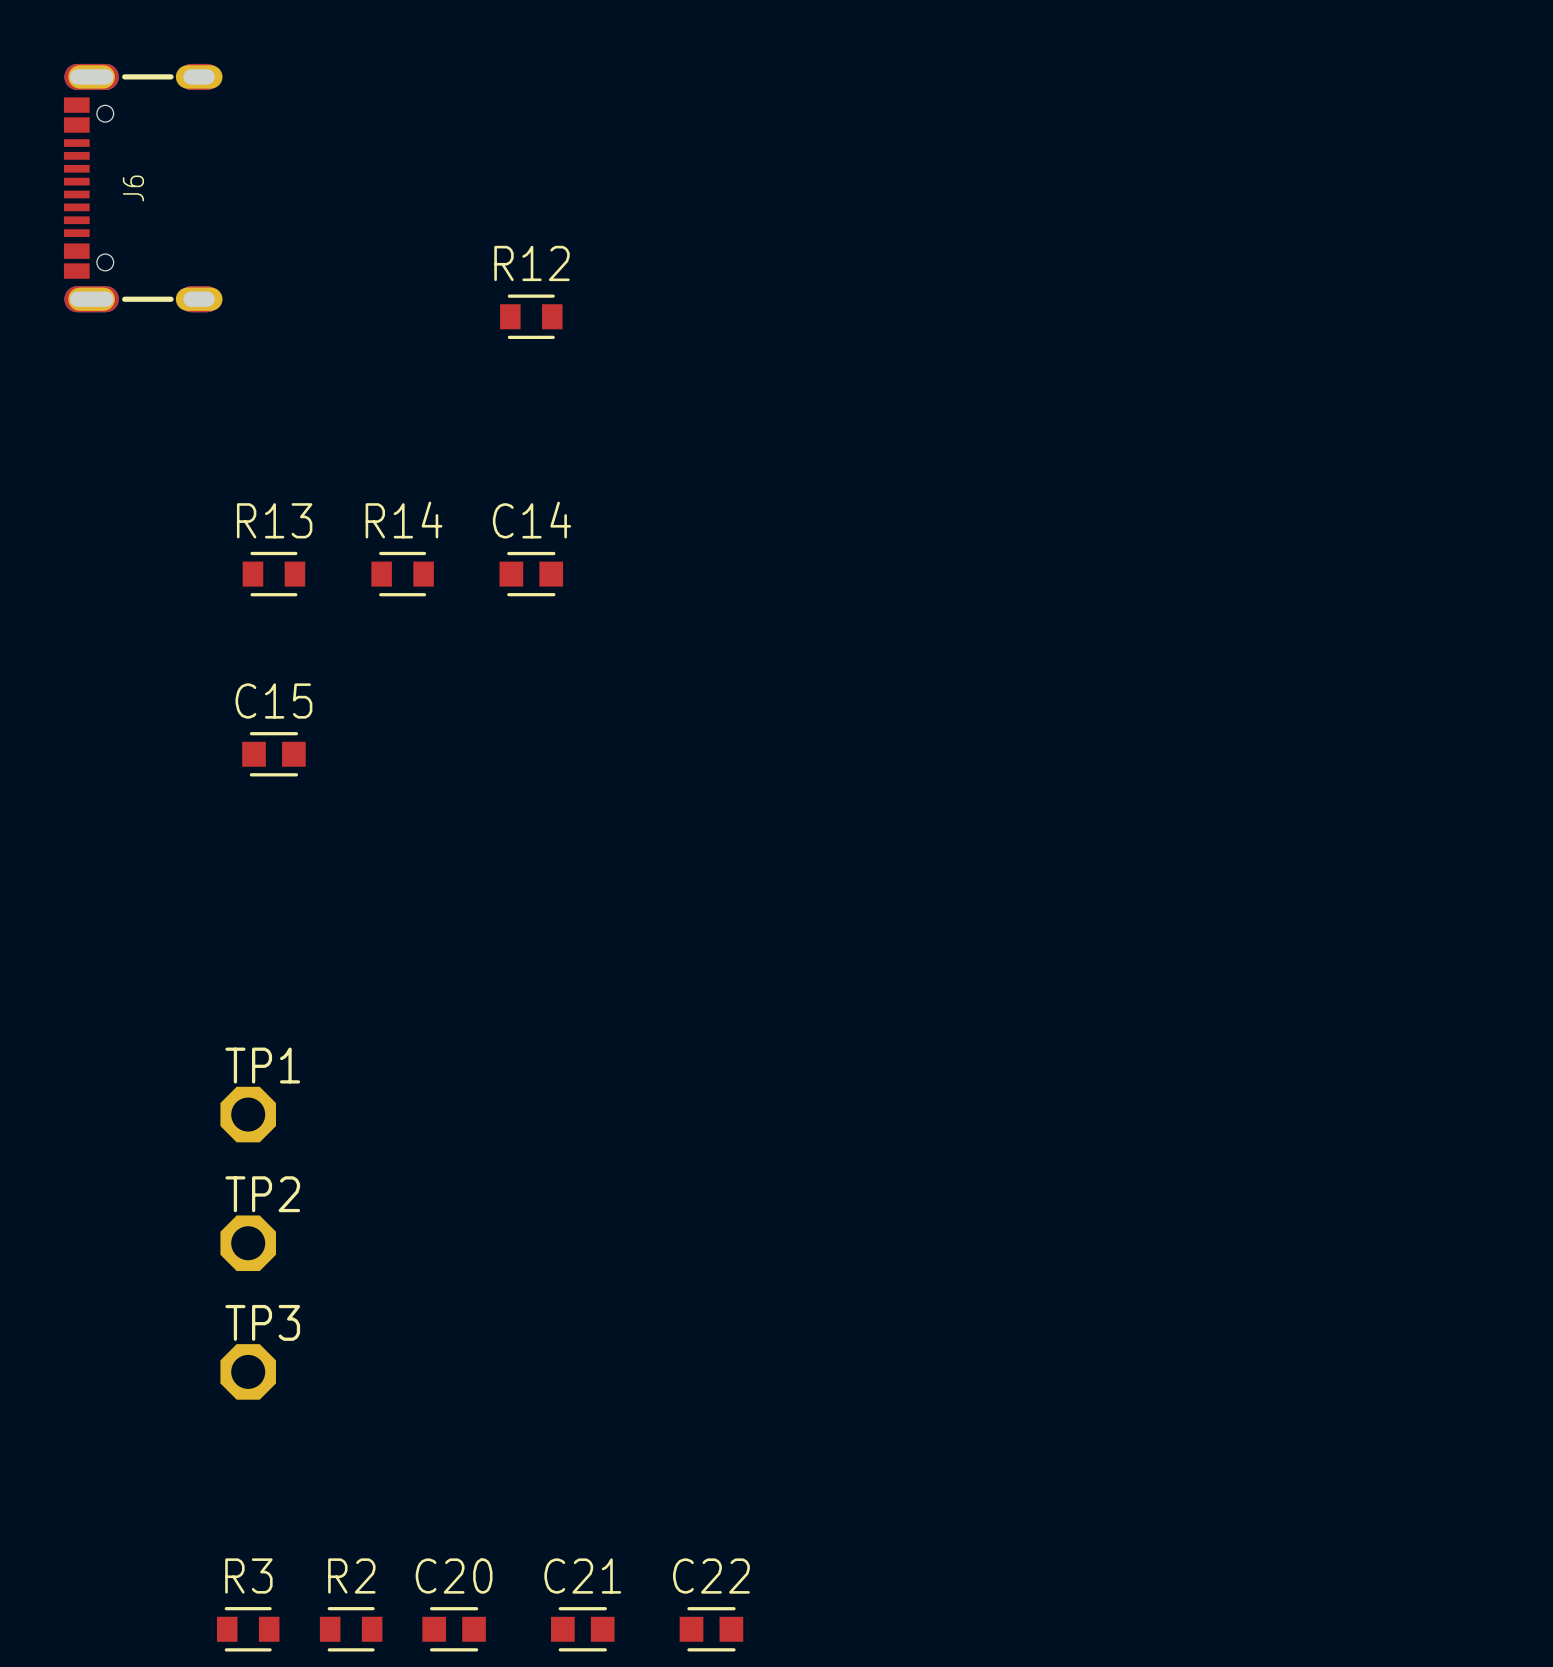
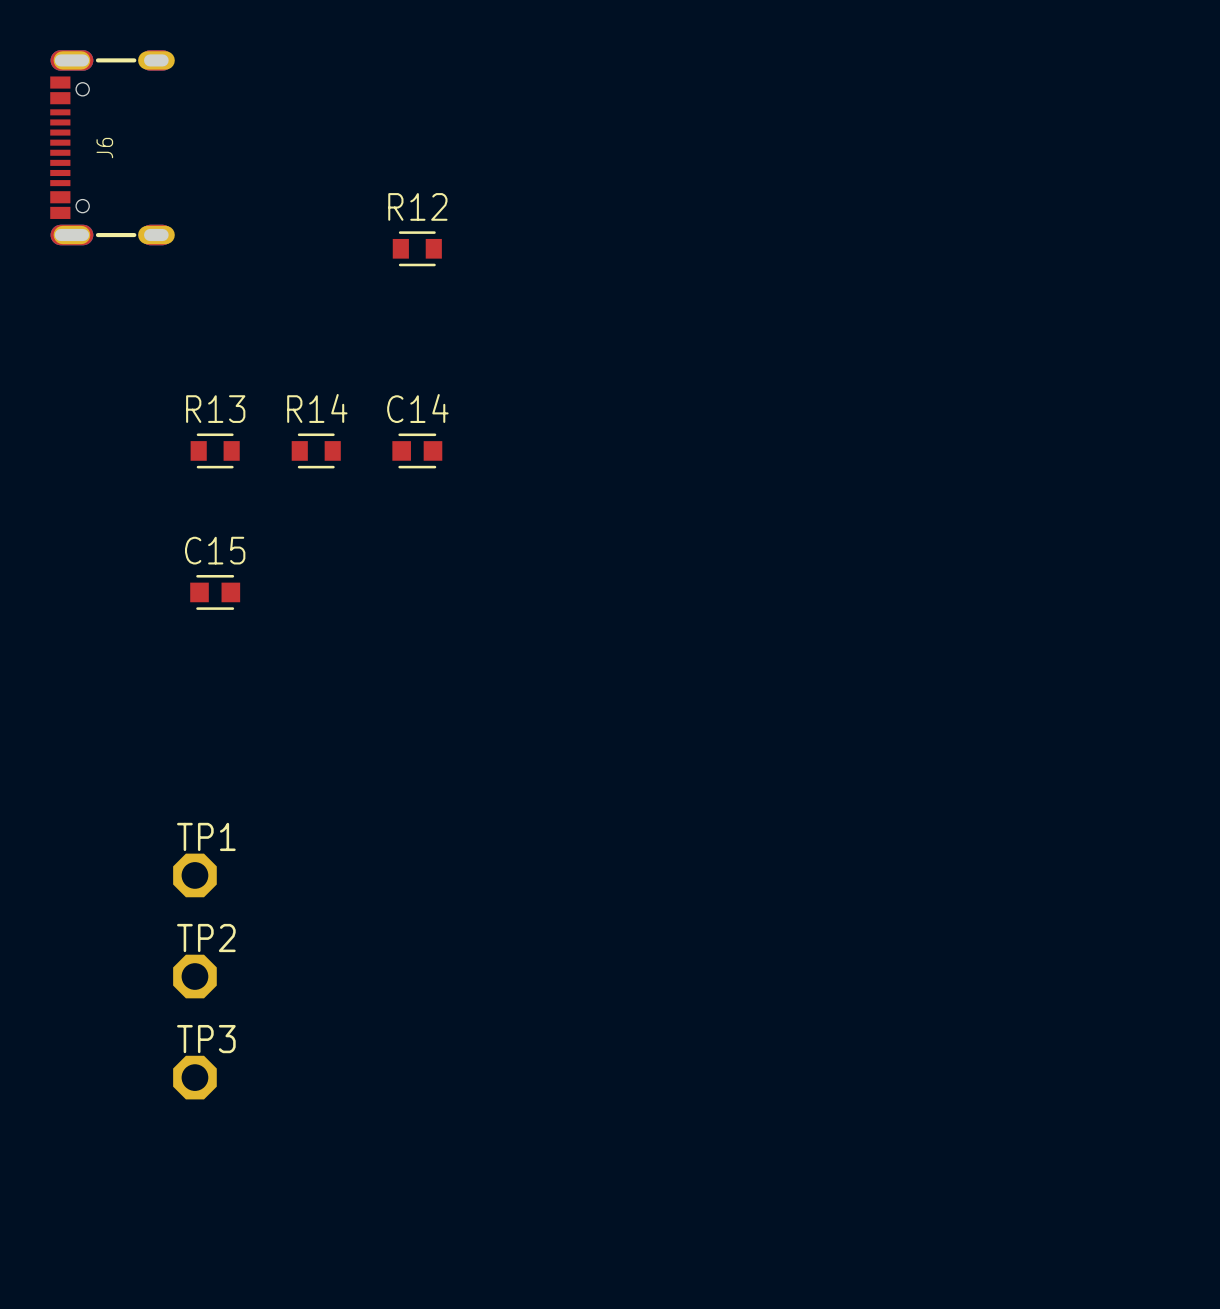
R3: (248, 1629) -> none
R2: (351, 1629) -> none
C20: (454, 1629) -> none
C21: (582, 1629) -> none
C22: (711, 1629) -> none

